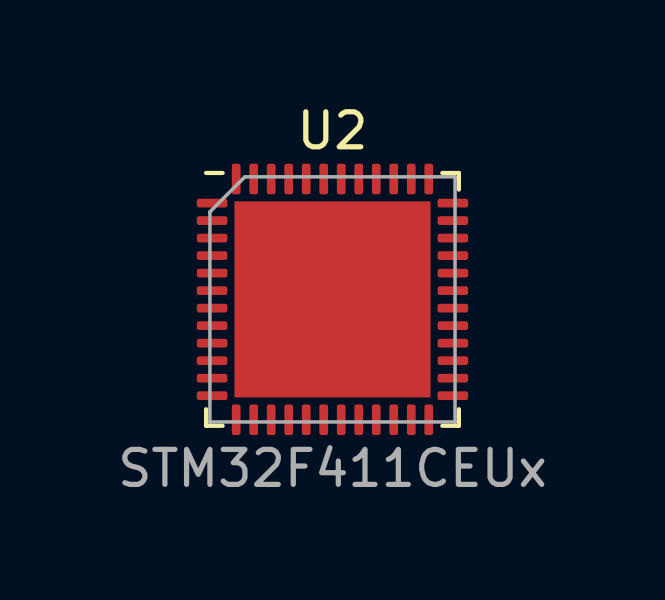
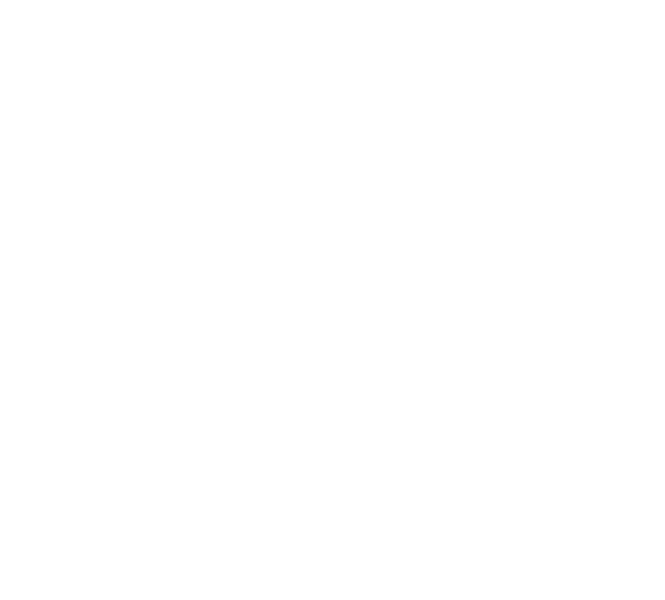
U2: STM32F411CEUx (332, 299) -> none

